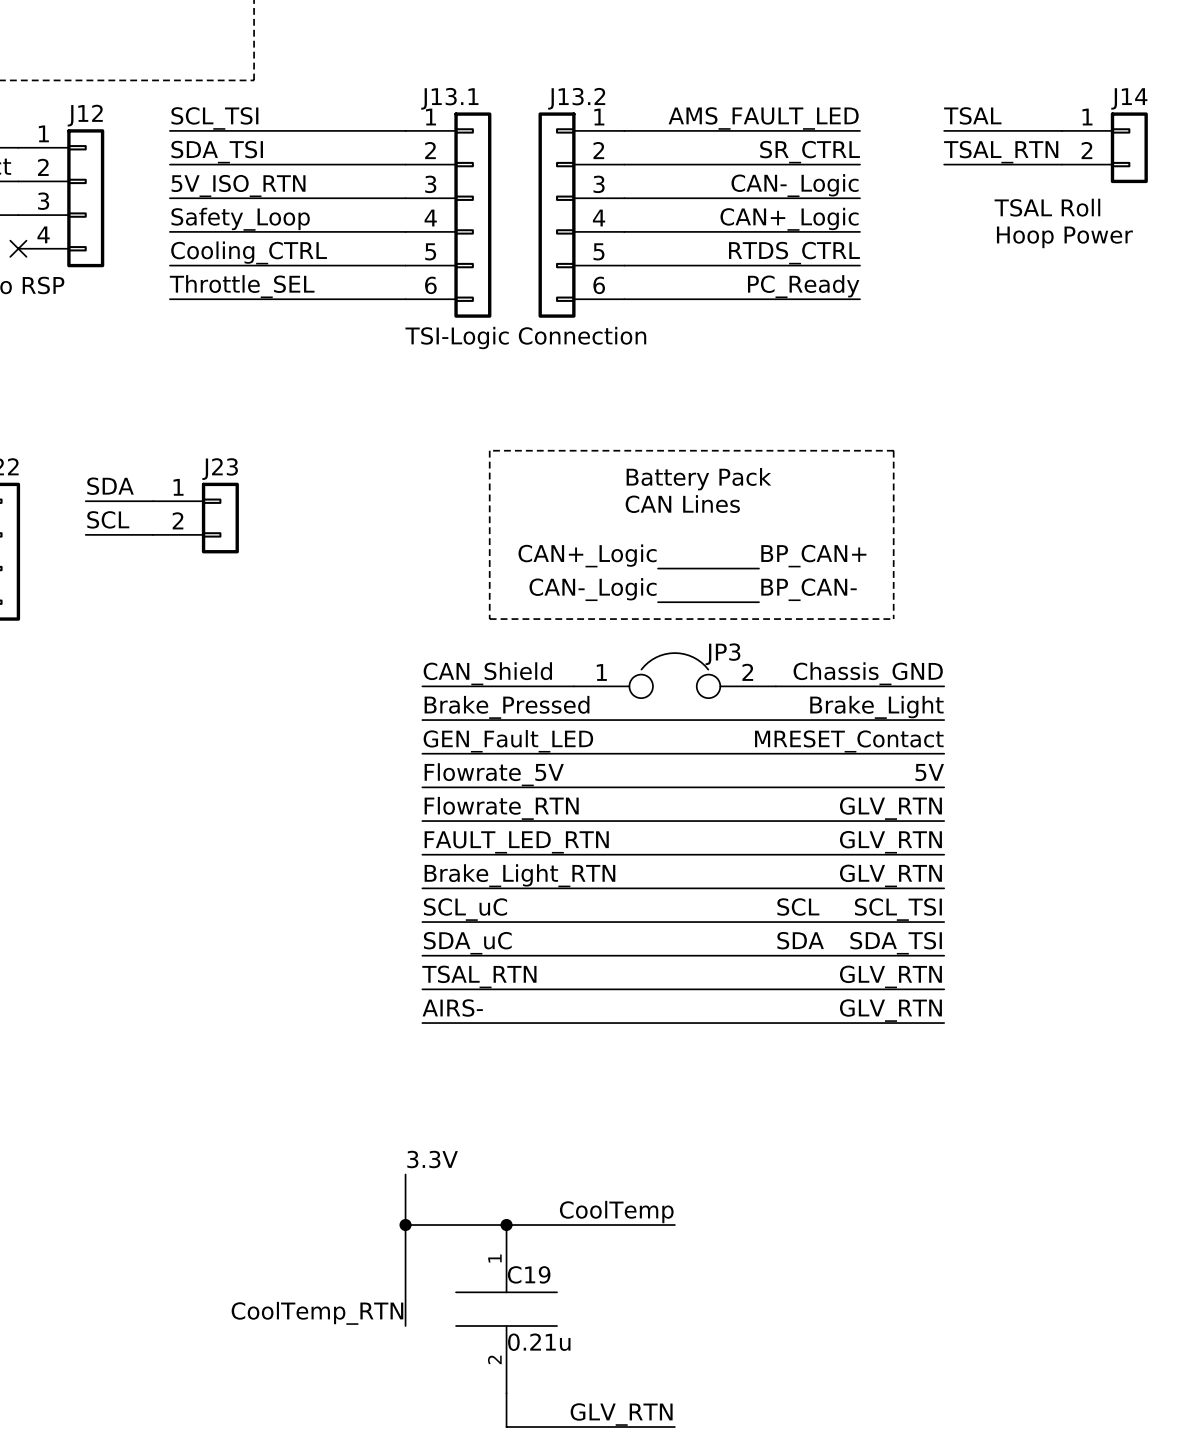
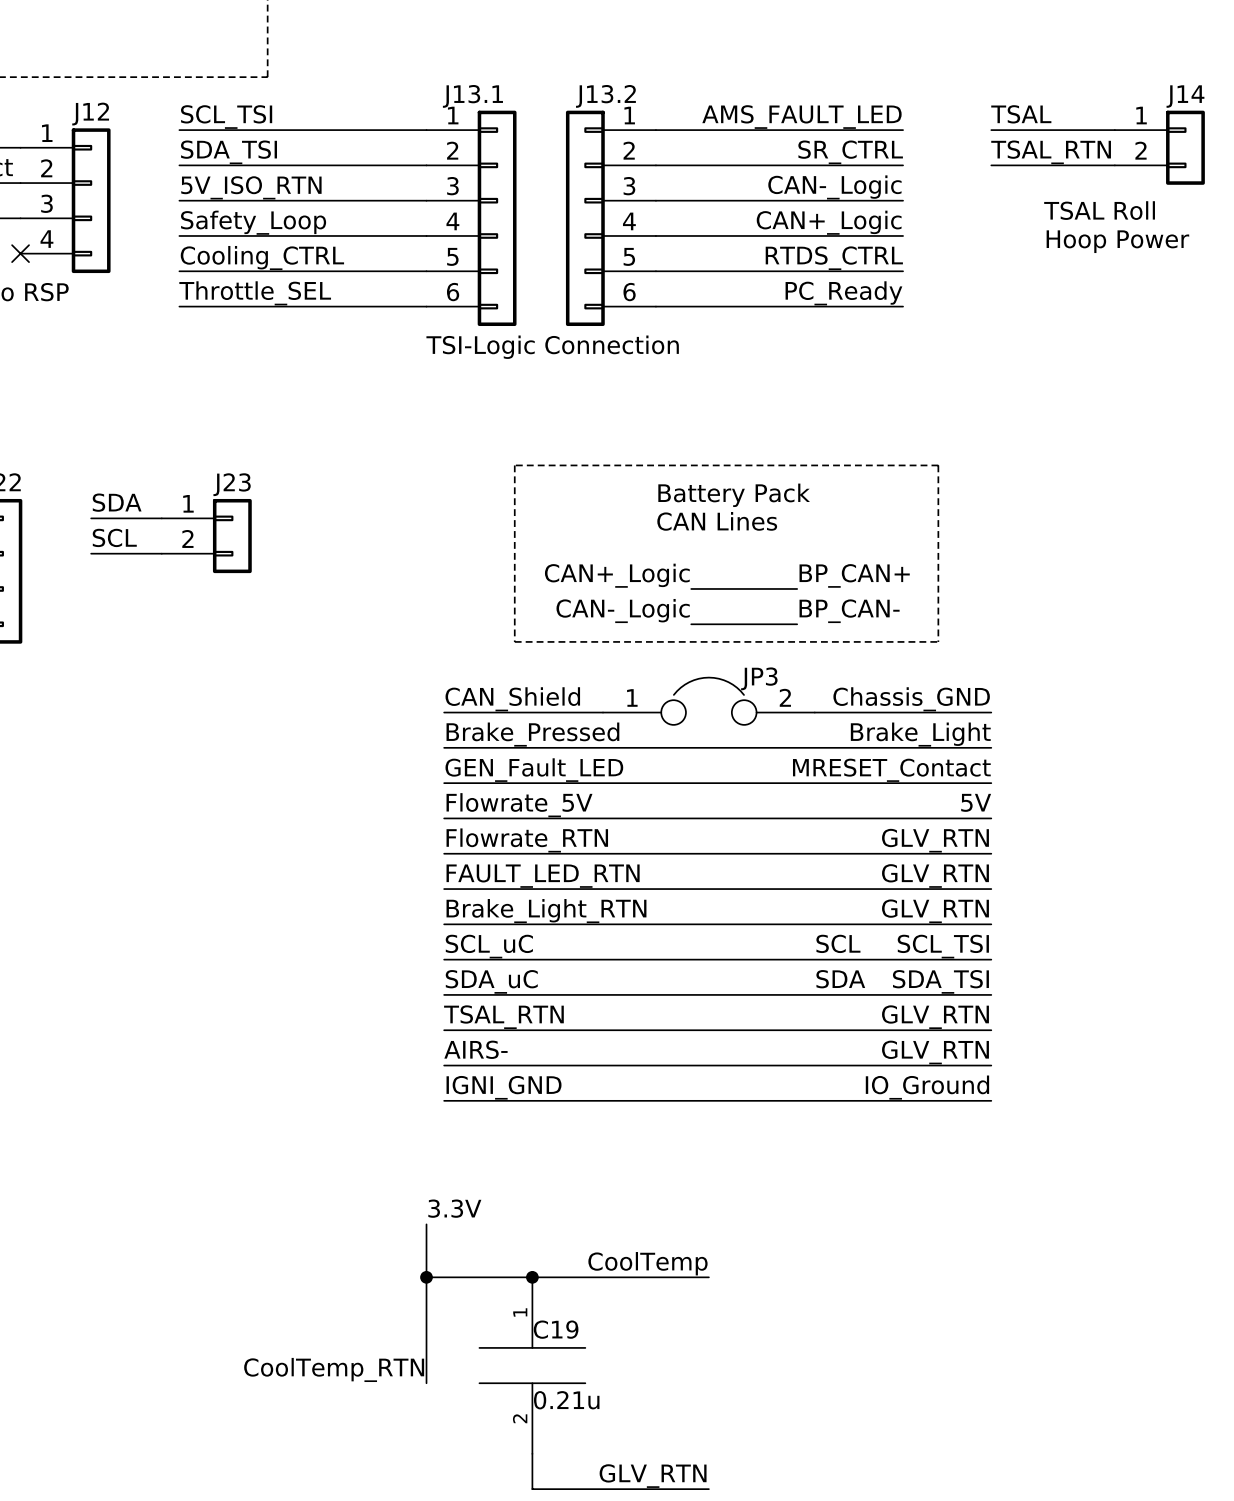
label: none -> IGNI_GND (504, 1087)
label: none -> IO_Ground (927, 1087)
wire: none -> (444, 1100) (991, 1100)

